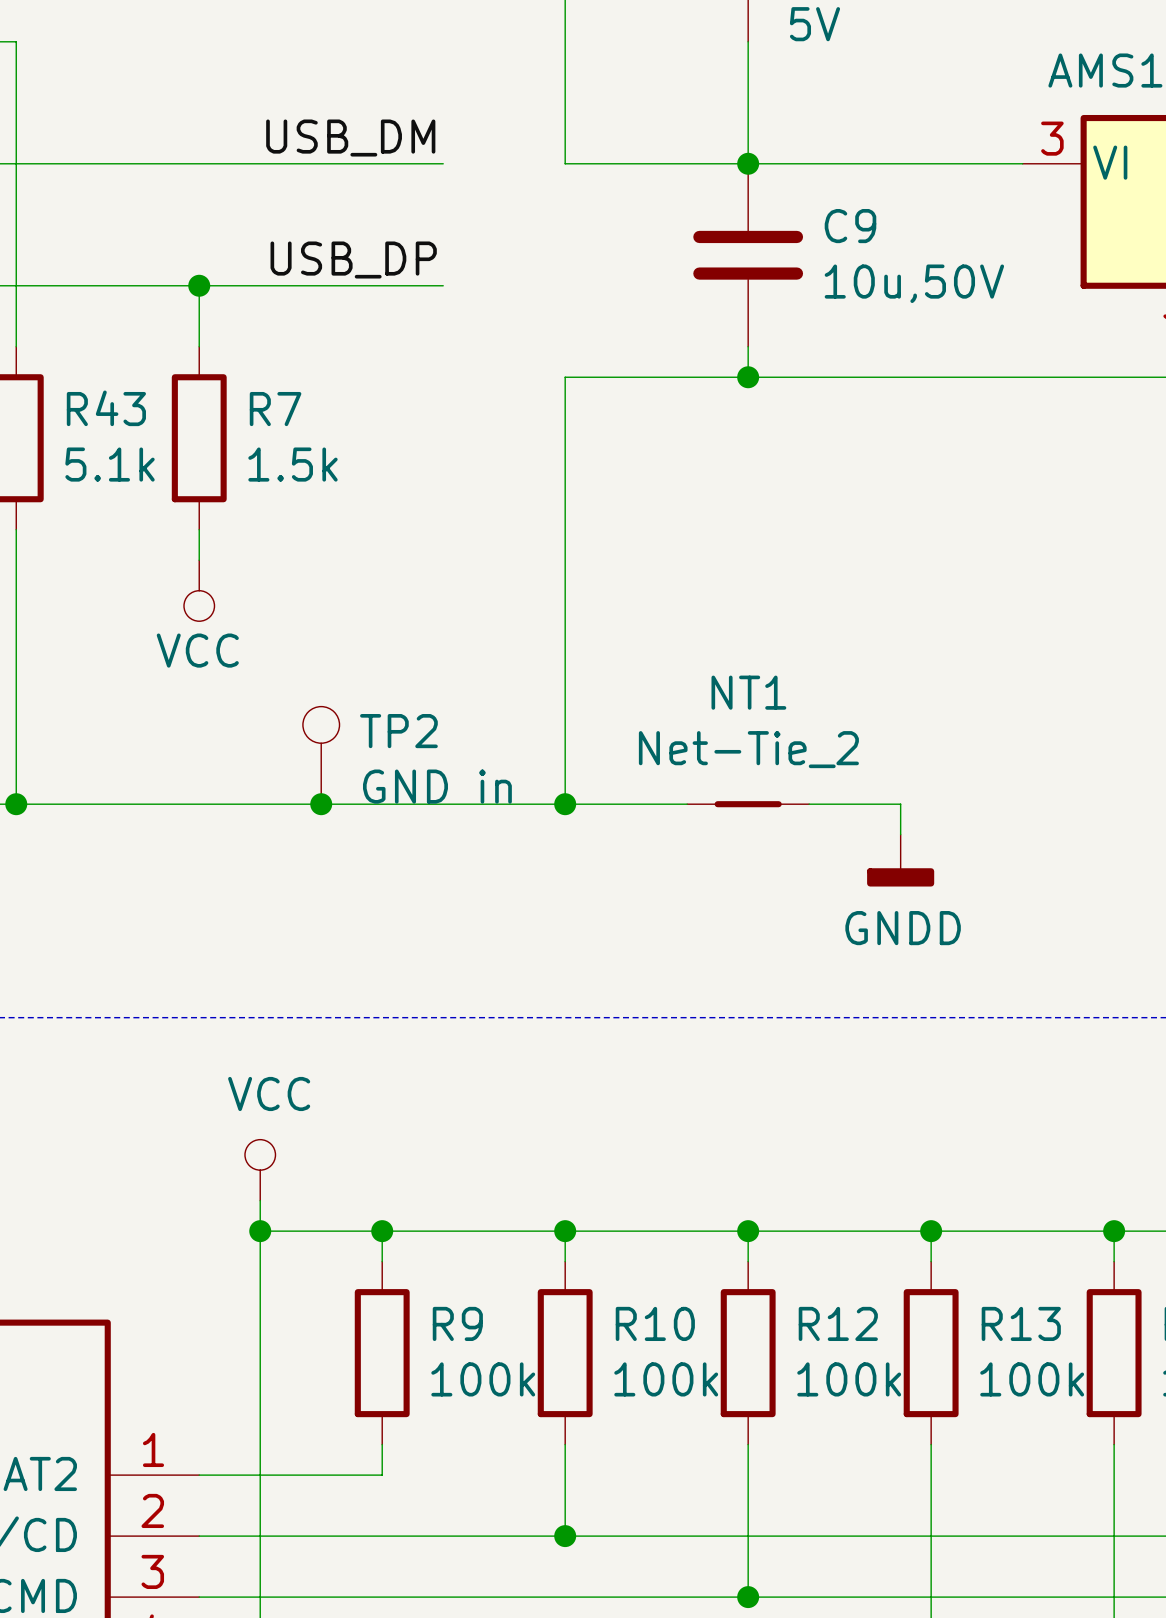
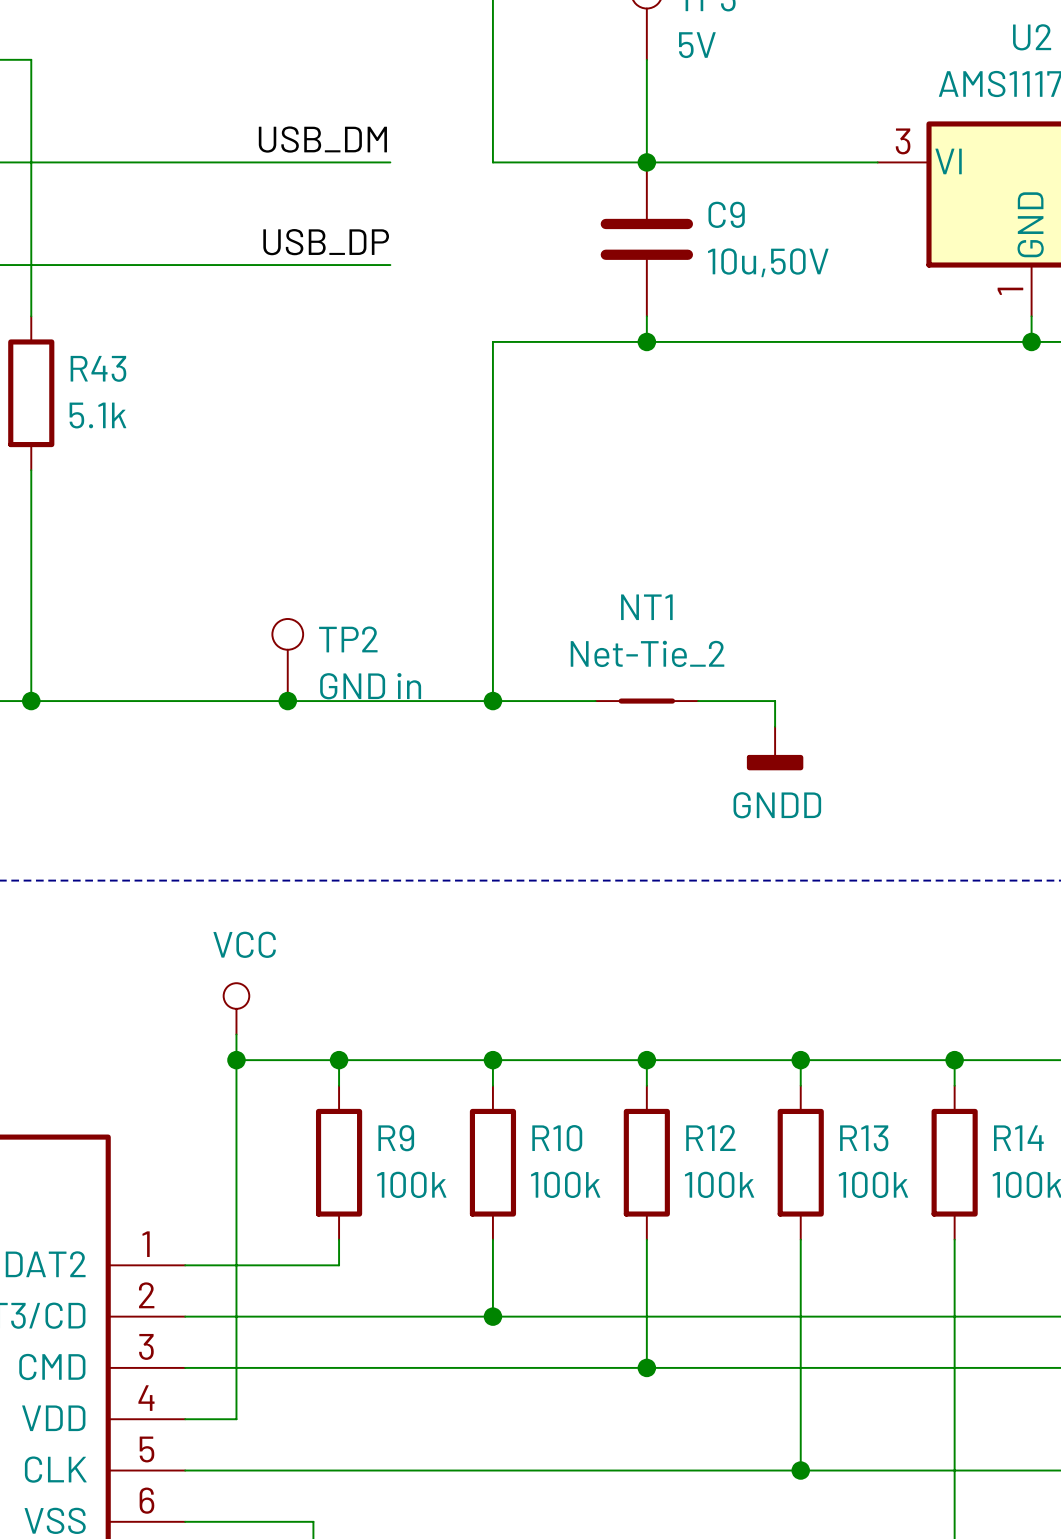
wire: (199, 285) (199, 346) -> none
junction: (199, 285) -> none
R7: 1.5k (199, 438) -> none
wire: (199, 529) (199, 560) -> none
power symbol: VCC (199, 590) -> none

